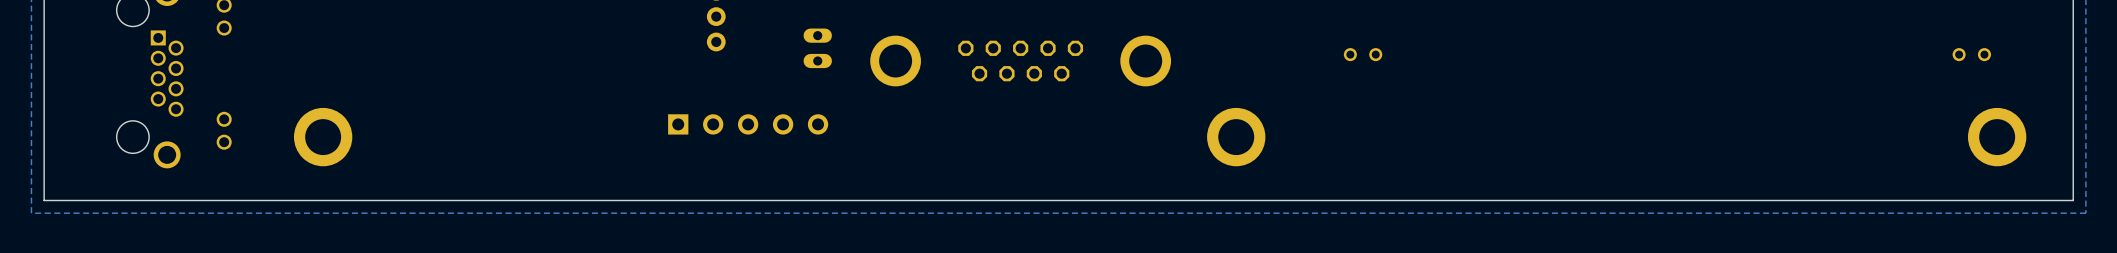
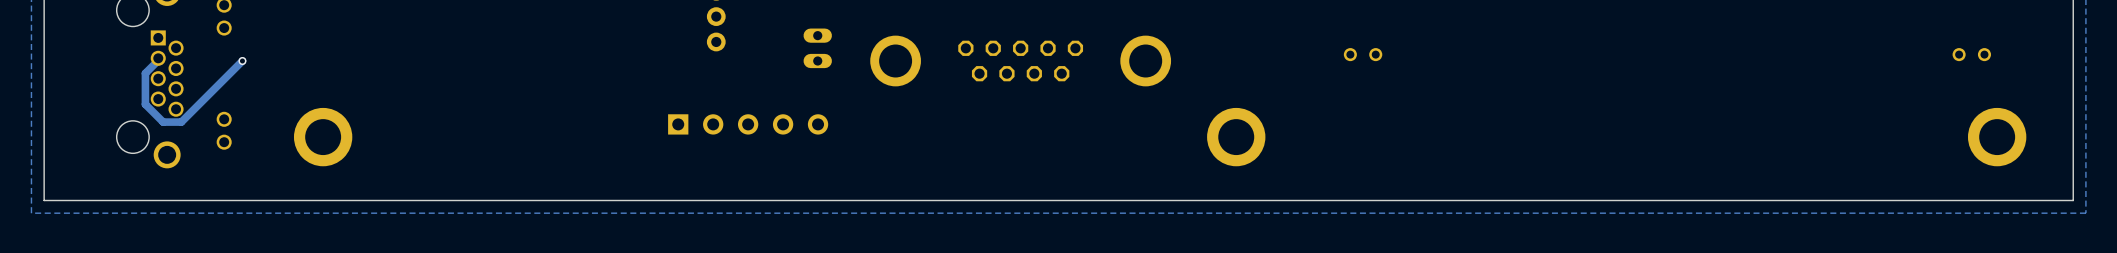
track: none -> (158, 58) (145, 73) (145, 104) (163, 122) (181, 122) (242, 61)
via: none -> (242, 61)

